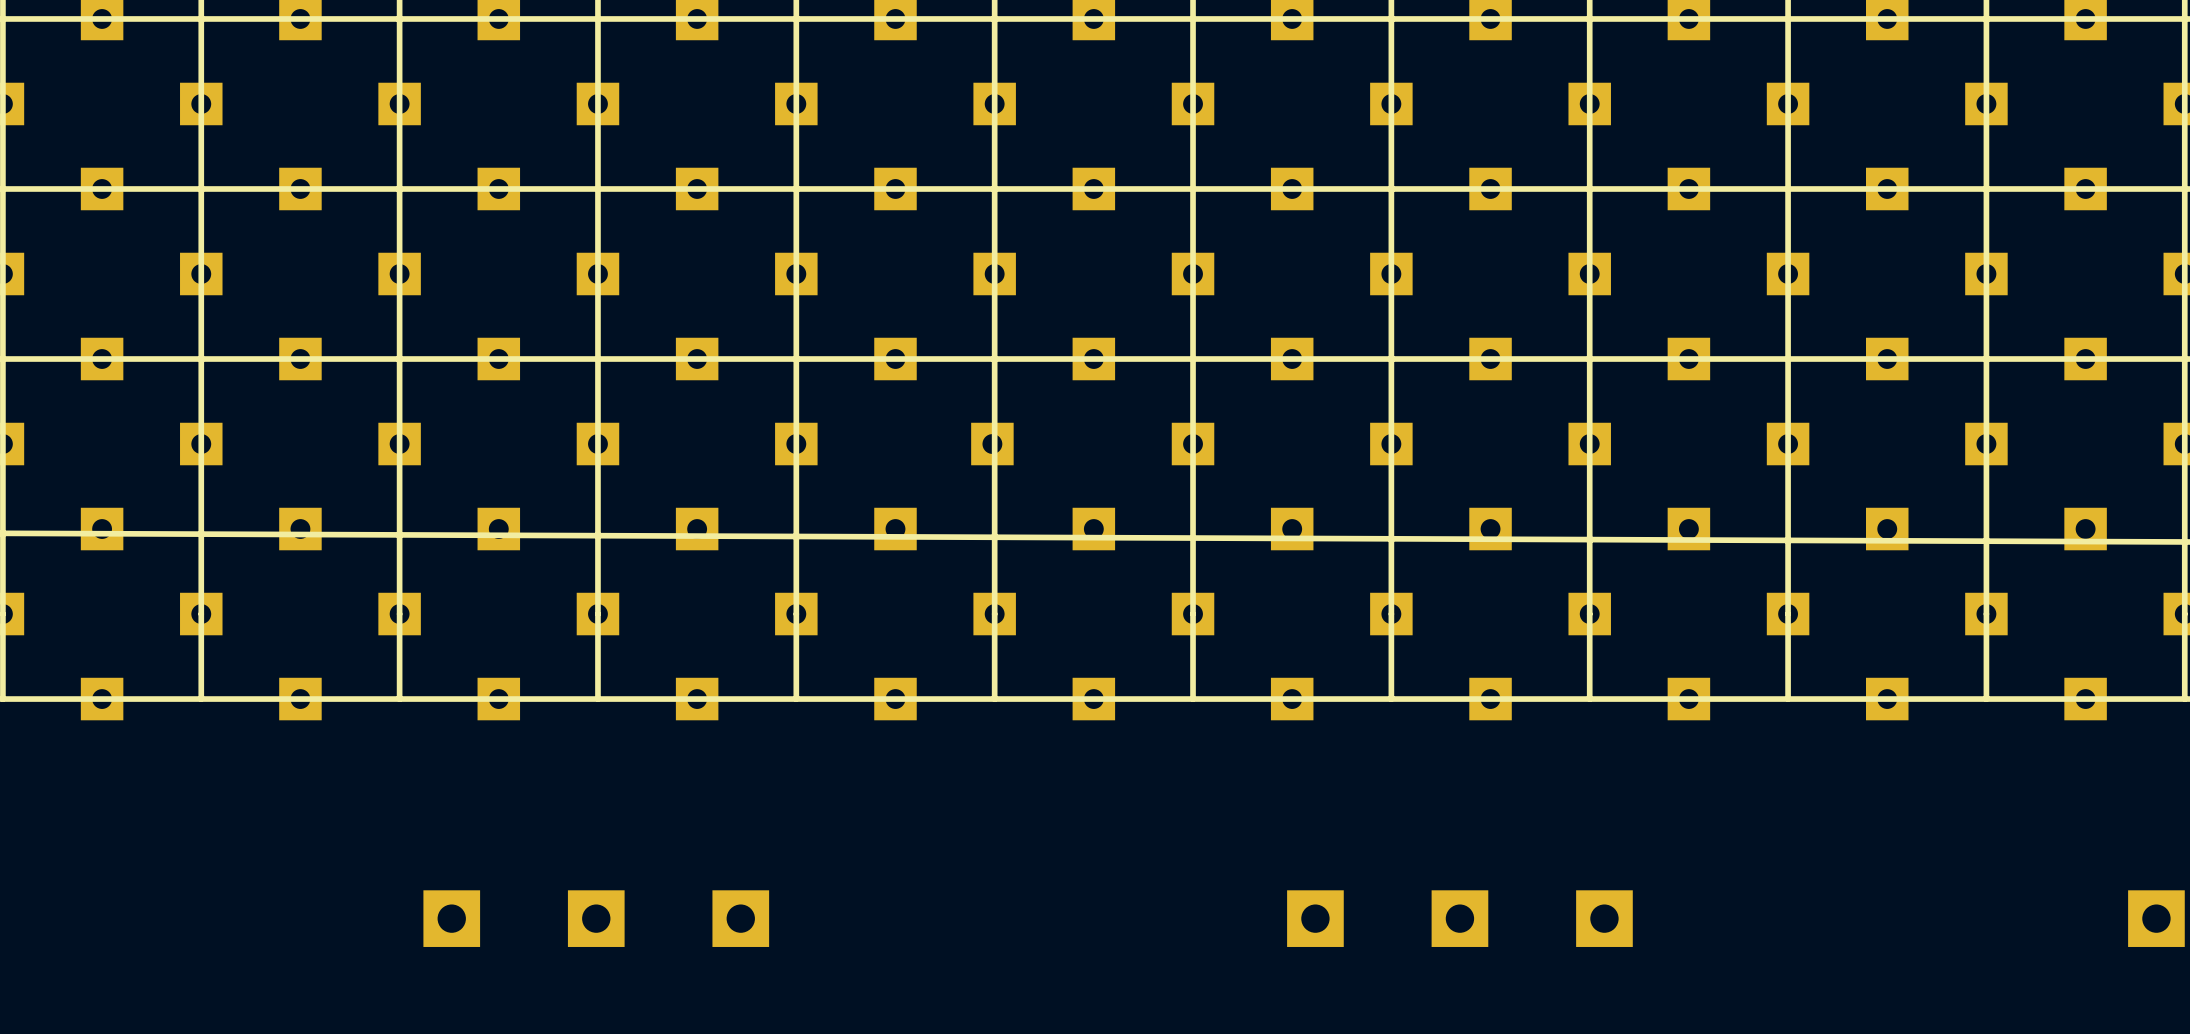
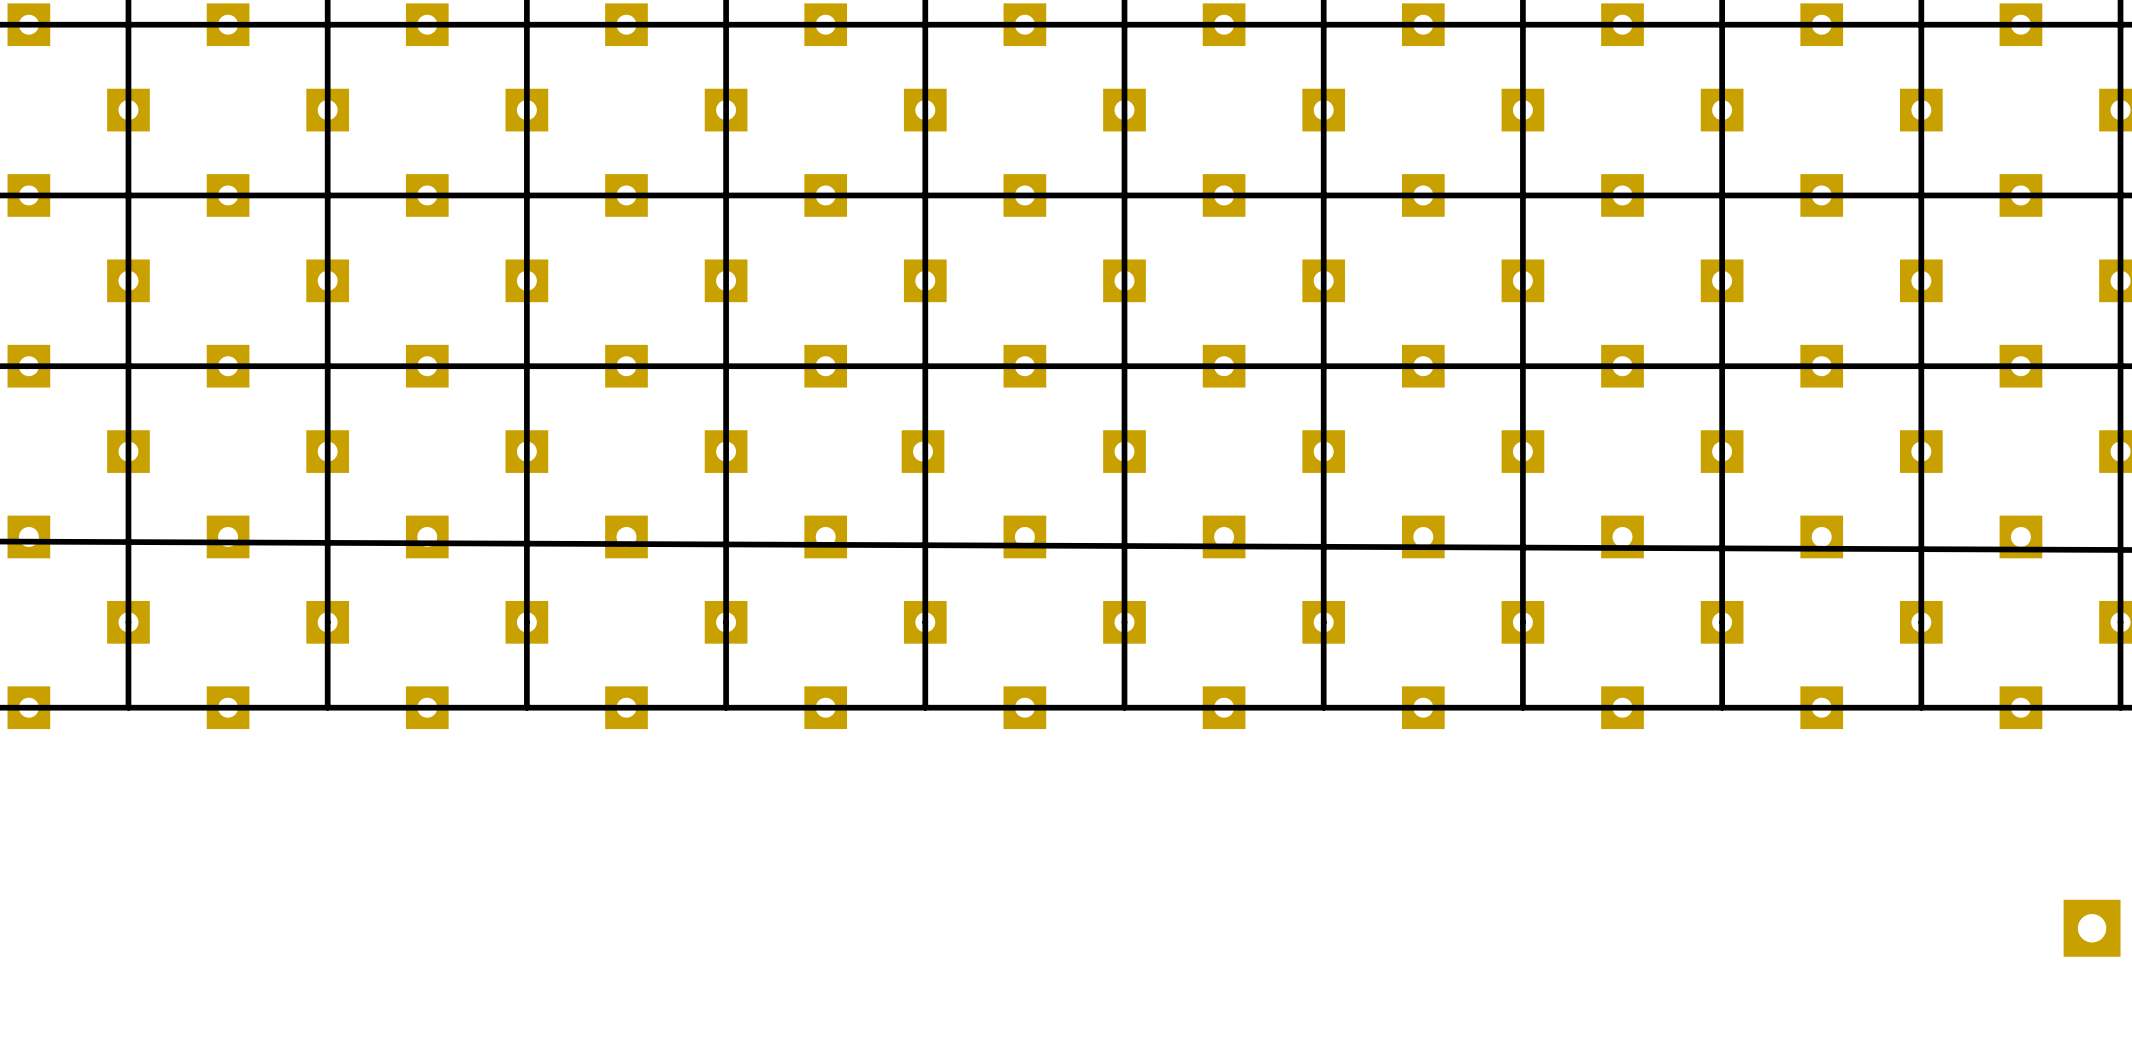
part: (451, 918) -> none
part: (596, 918) -> none
part: (740, 918) -> none
part: (1315, 918) -> none
part: (1459, 918) -> none
part: (1604, 918) -> none

